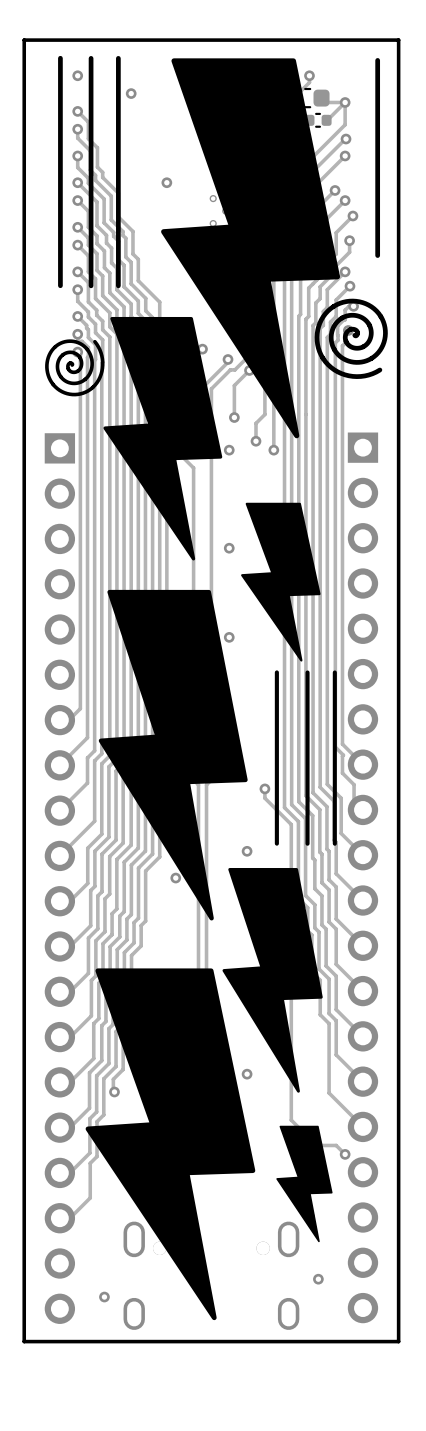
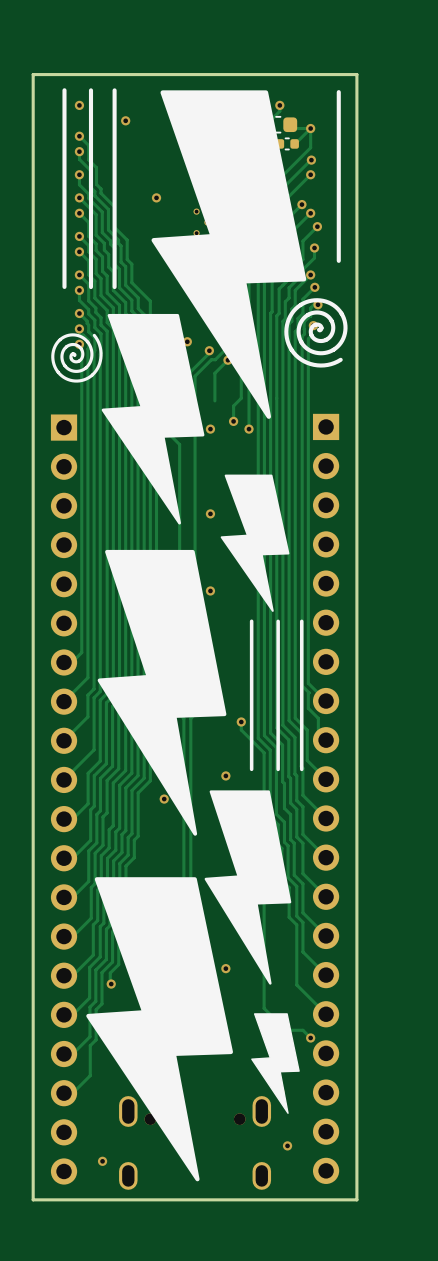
via: (234, 417) -> none

